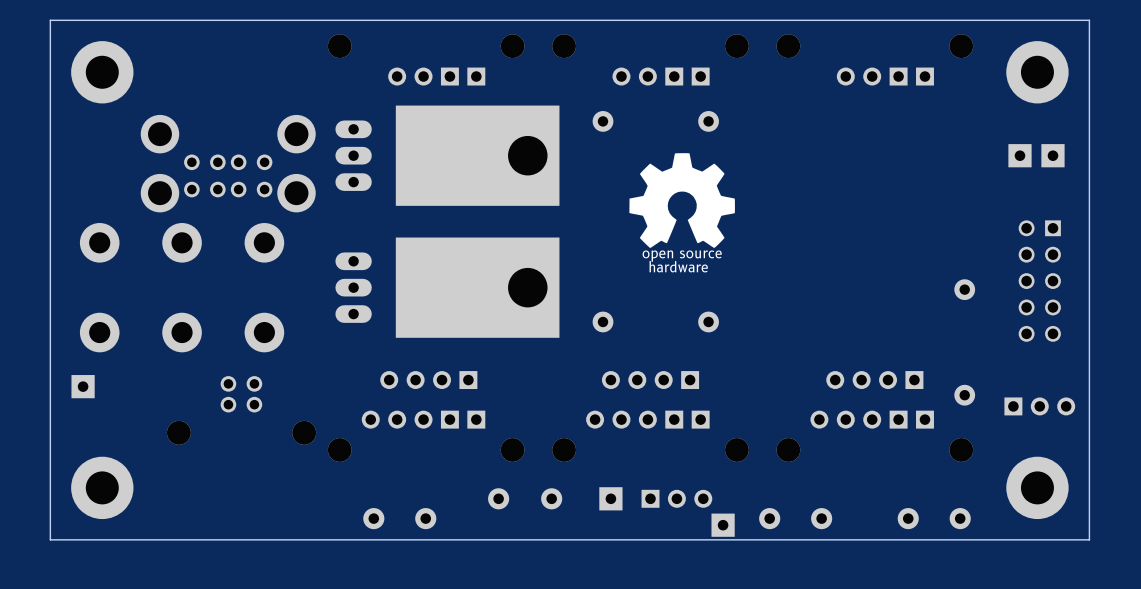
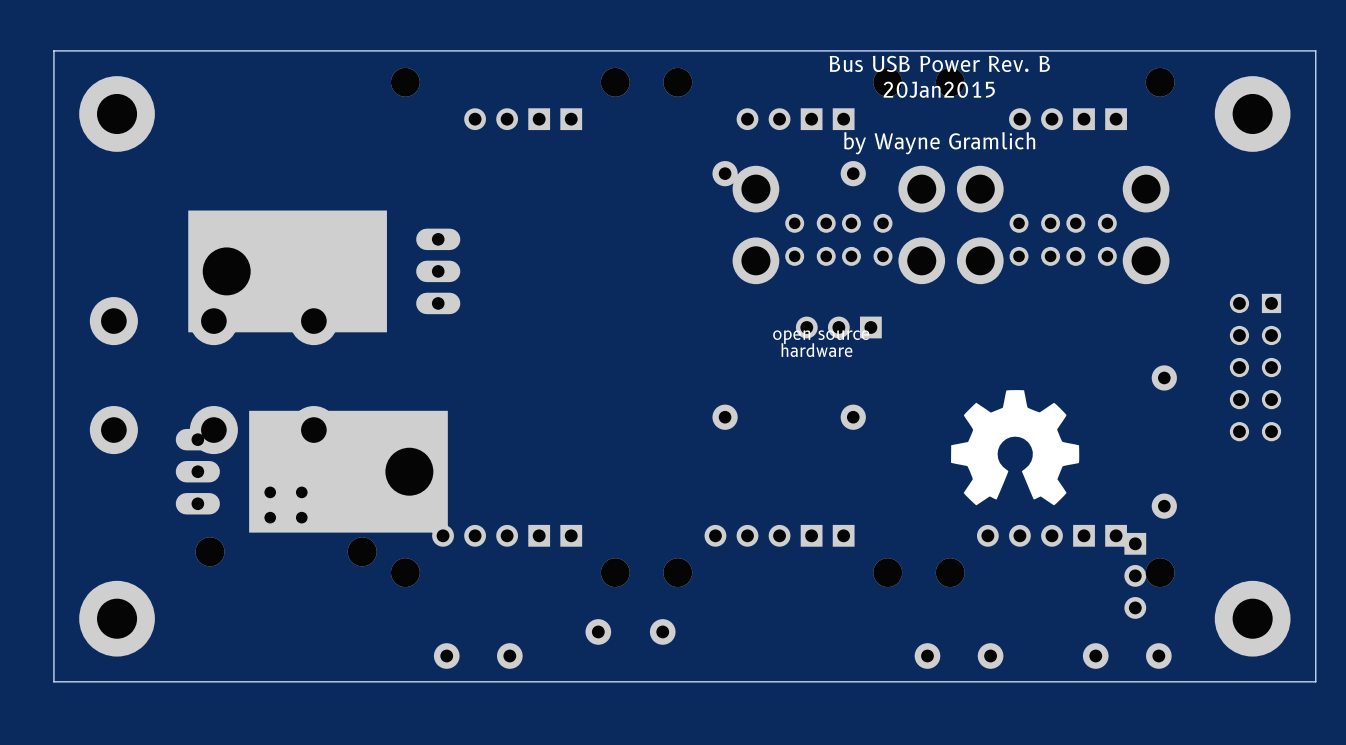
text: none -> Bus USB Power Rev. B (939, 63)
text: none -> 20Jan2015 (939, 89)
text: none -> by Wayne Gramlich (939, 143)
part: (447, 155) -> none
part: (1019, 155) -> none
part: (1052, 155) -> none
part: (228, 163) -> none
part: none -> (838, 224)
part: none -> (1063, 224)
drawing position: (682, 200) -> (1015, 447)
part: none -> (324, 271)
part: none -> (838, 327)
part: (447, 287) -> none
part: none -> (311, 471)
part: (428, 380) -> none
part: (650, 380) -> none
part: (874, 380) -> none
part: (83, 386) -> none
part rotation: 0° (1039, 406) -> 90° clockwise (1135, 575)
part position: (1039, 406) -> (1135, 575)
part: (610, 498) -> none
part: (676, 498) -> none
part: (723, 525) -> none

